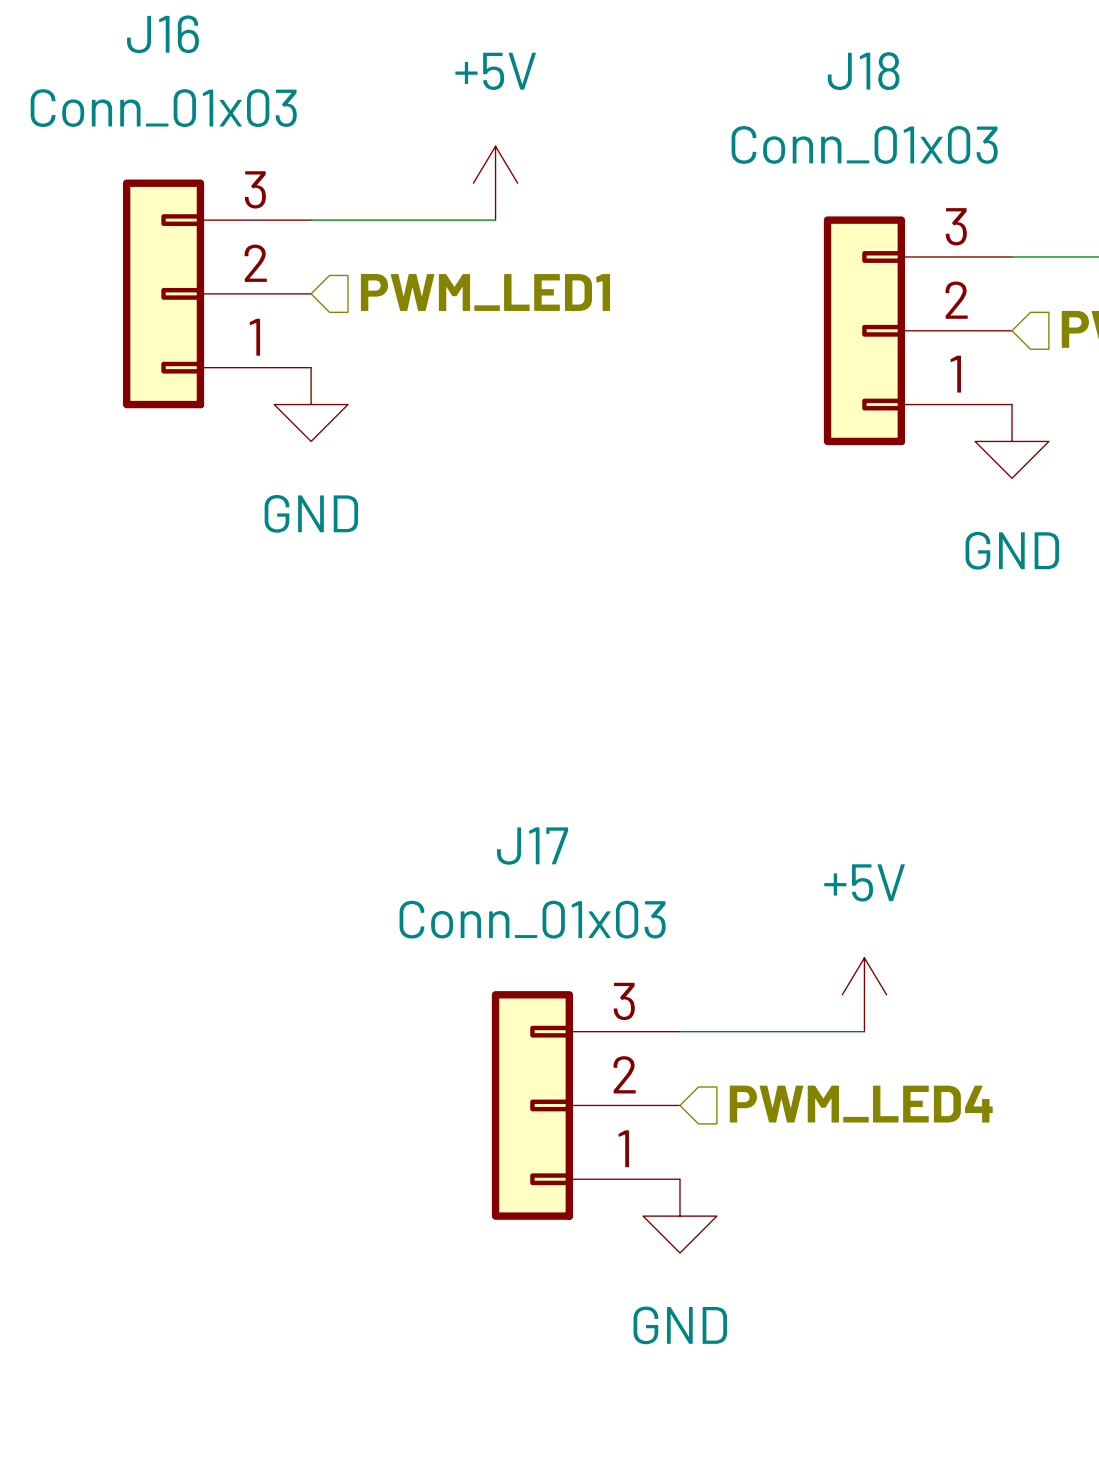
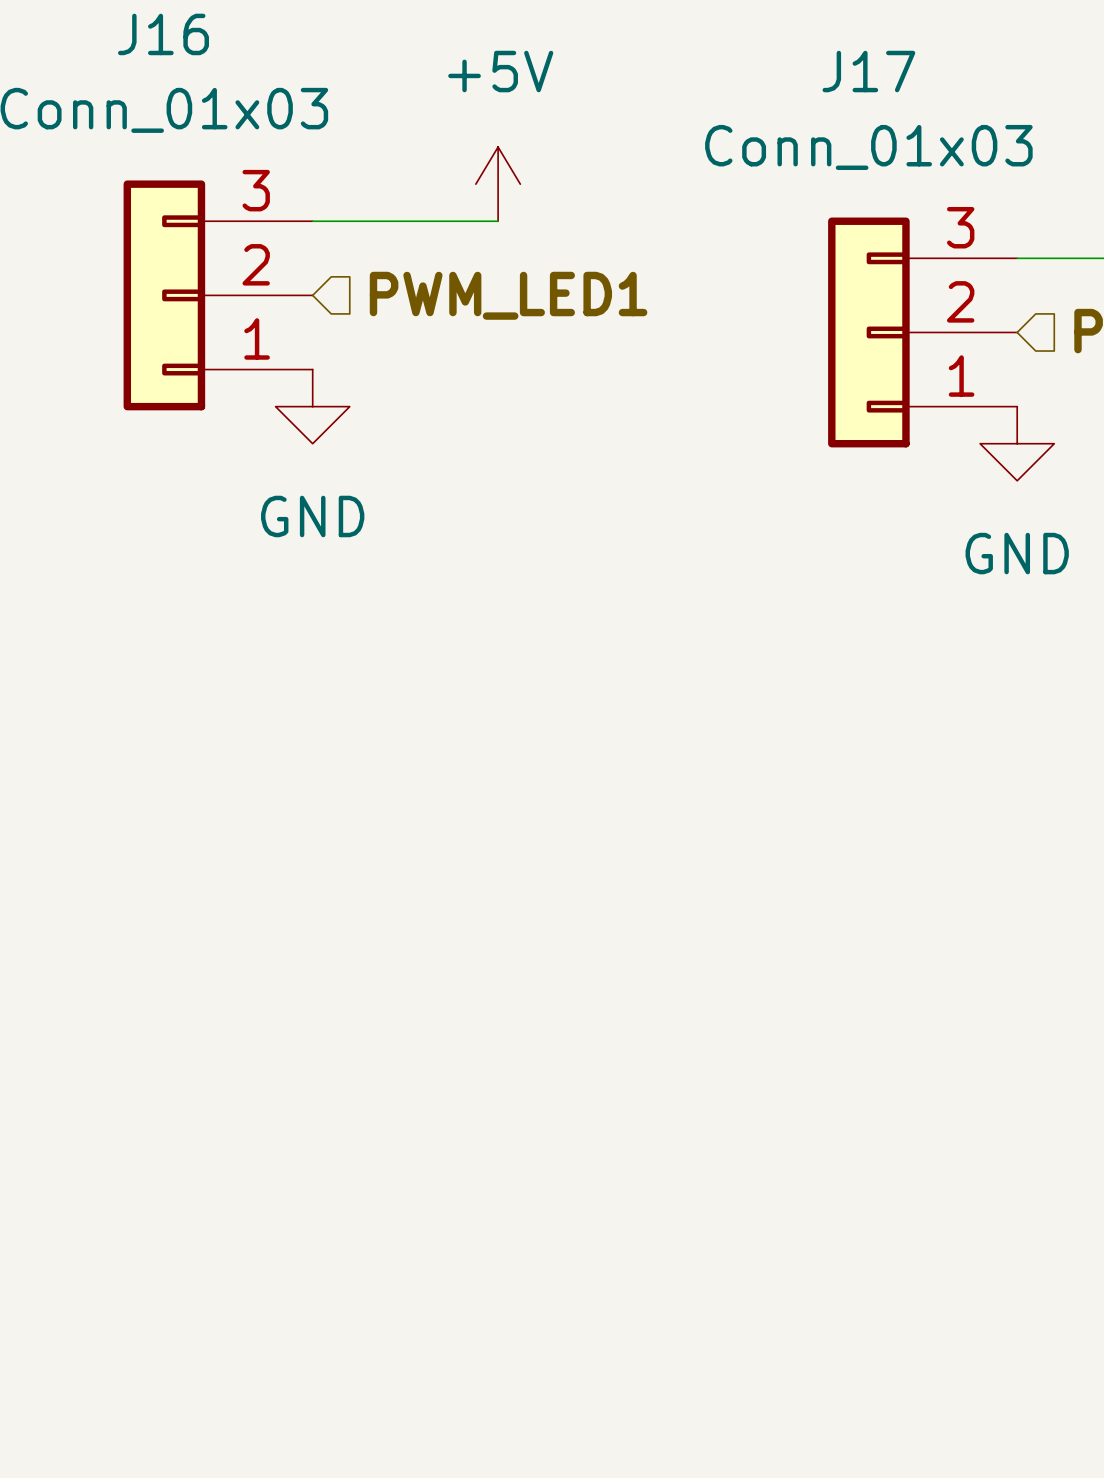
J18 name: J18 (863, 71) -> J17 (868, 71)
power symbol: +5V (864, 994) -> none
wire: (679, 1031) (864, 1031) -> none
hierarchical label: PWM_LED4 (861, 1104) -> none
J17: Conn_01x03 (585, 1105) -> none
power symbol: GND (679, 1216) -> none

